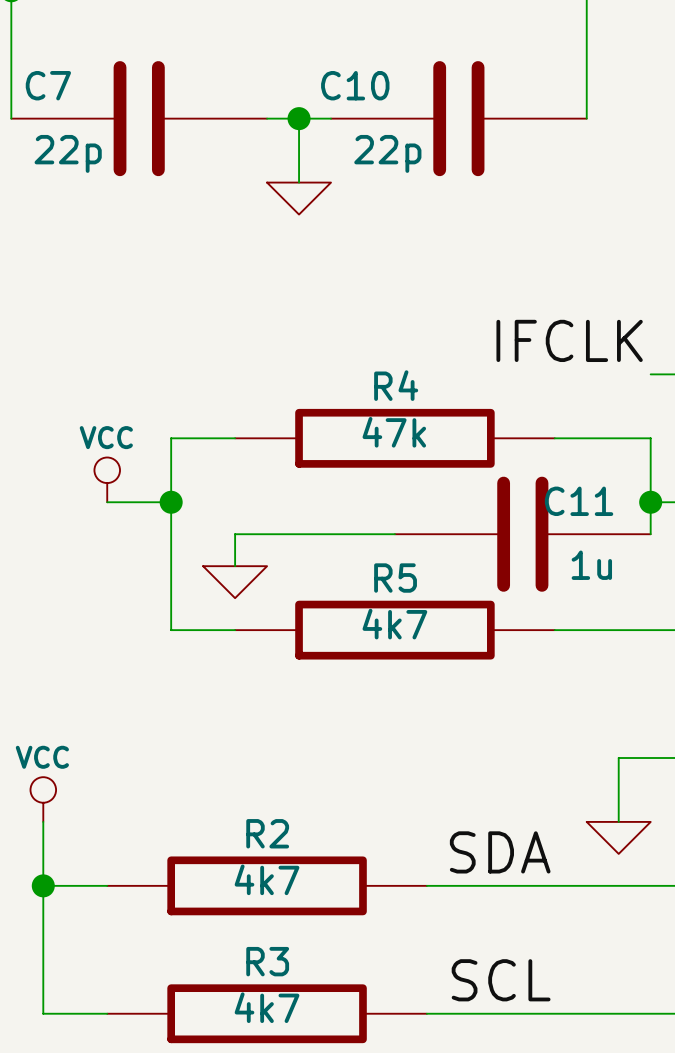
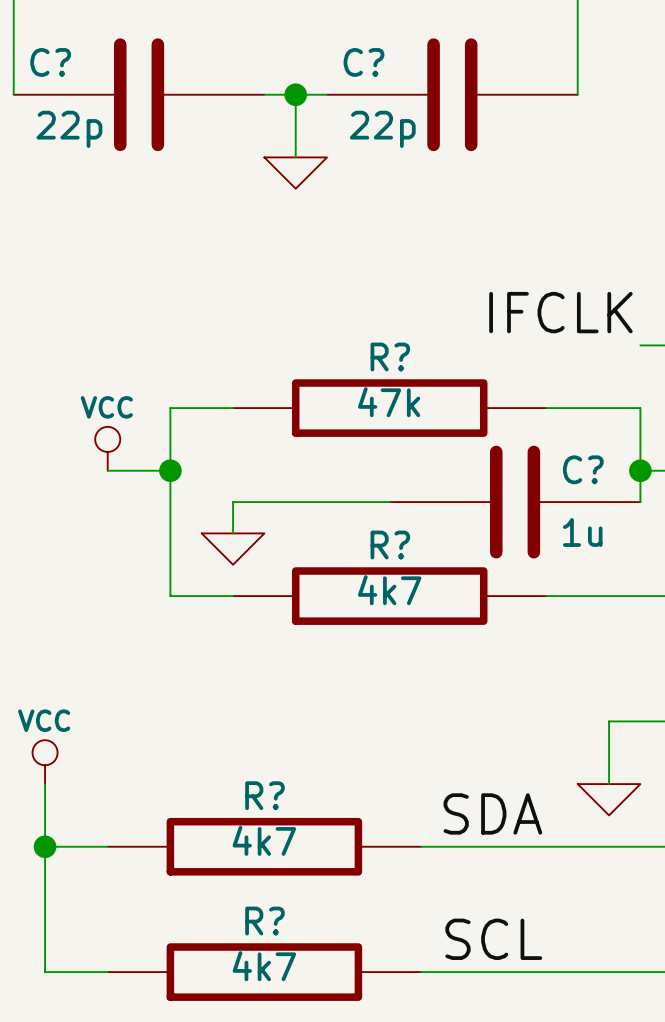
C7 name: C7 (48, 85) -> C? (50, 62)
C10 name: C10 (355, 85) -> C? (363, 62)
R4 name: R4 (396, 385) -> R? (390, 357)
C11 name: C11 (579, 501) -> C? (583, 469)
R5 name: R5 (395, 578) -> R? (390, 545)
R2 name: R2 (267, 833) -> R? (264, 795)
R3 name: R3 (267, 961) -> R? (264, 921)

